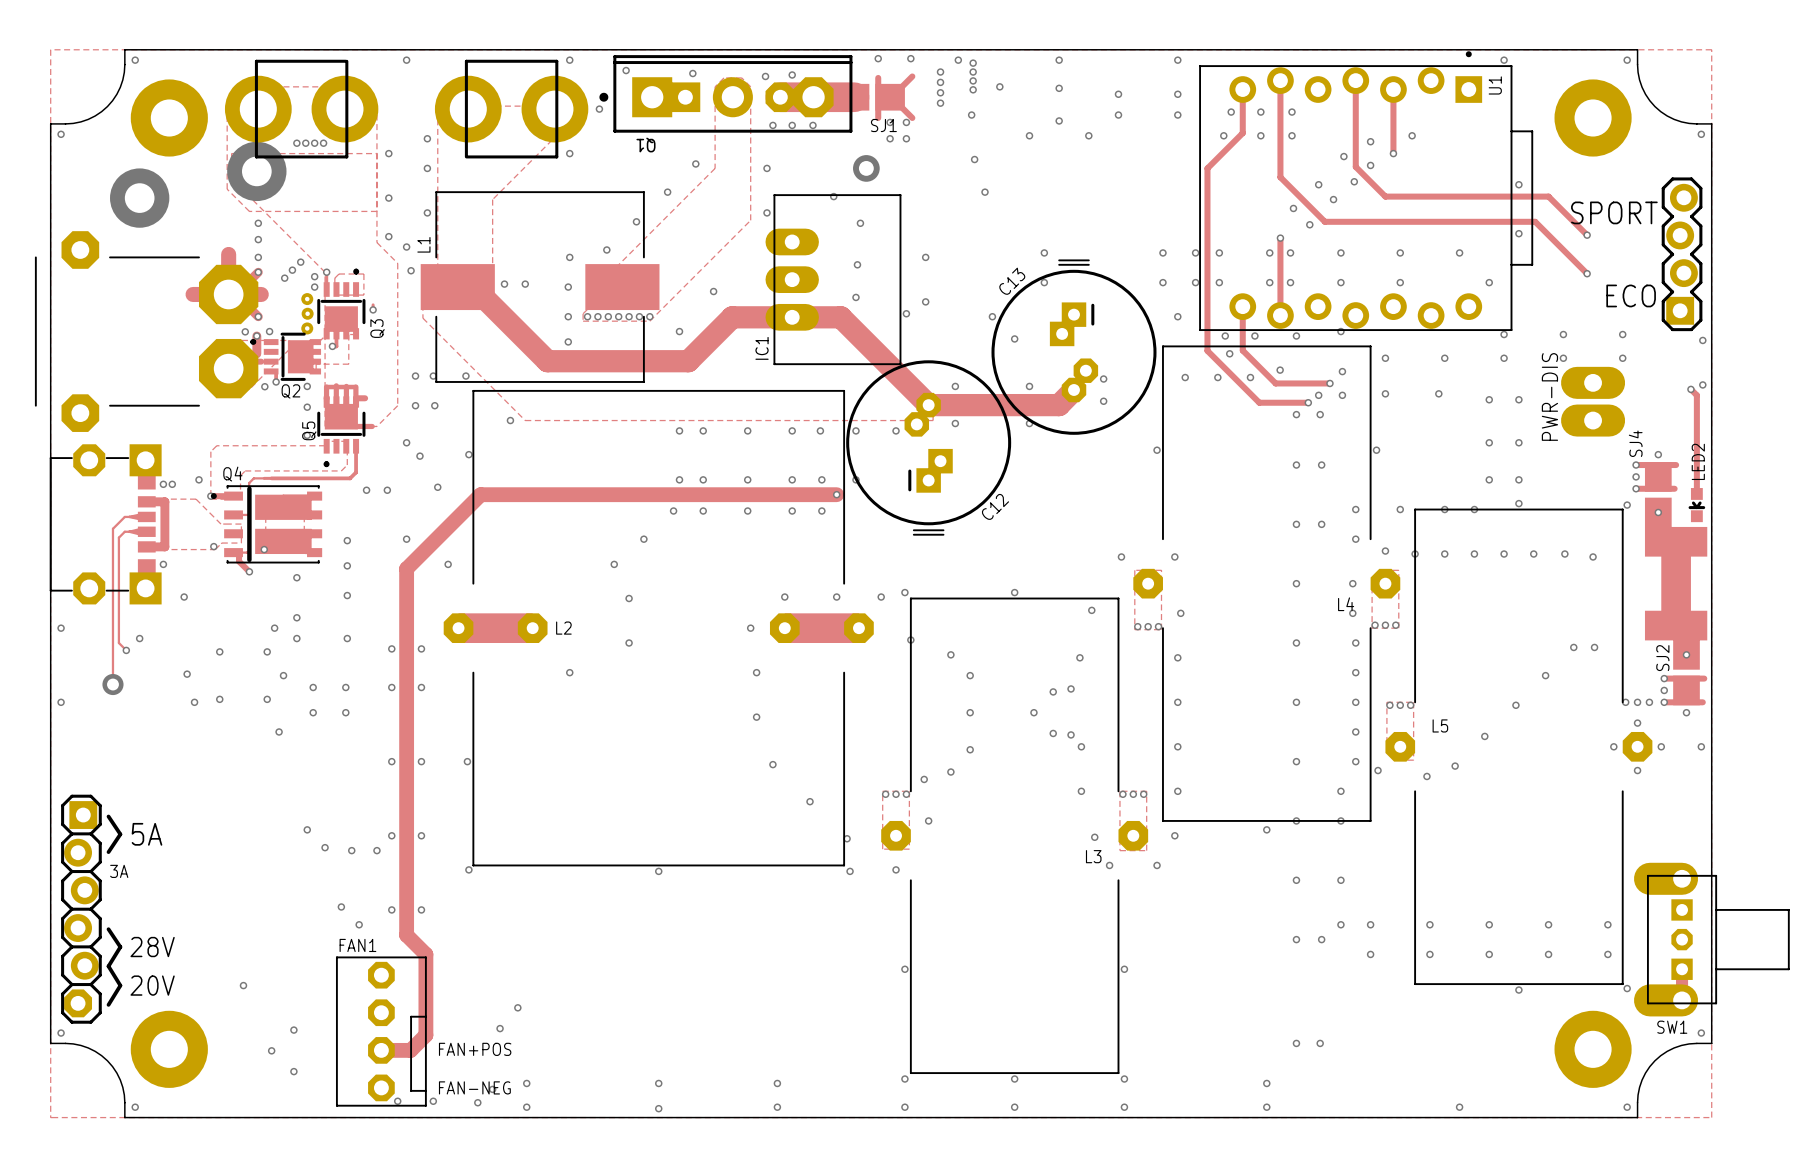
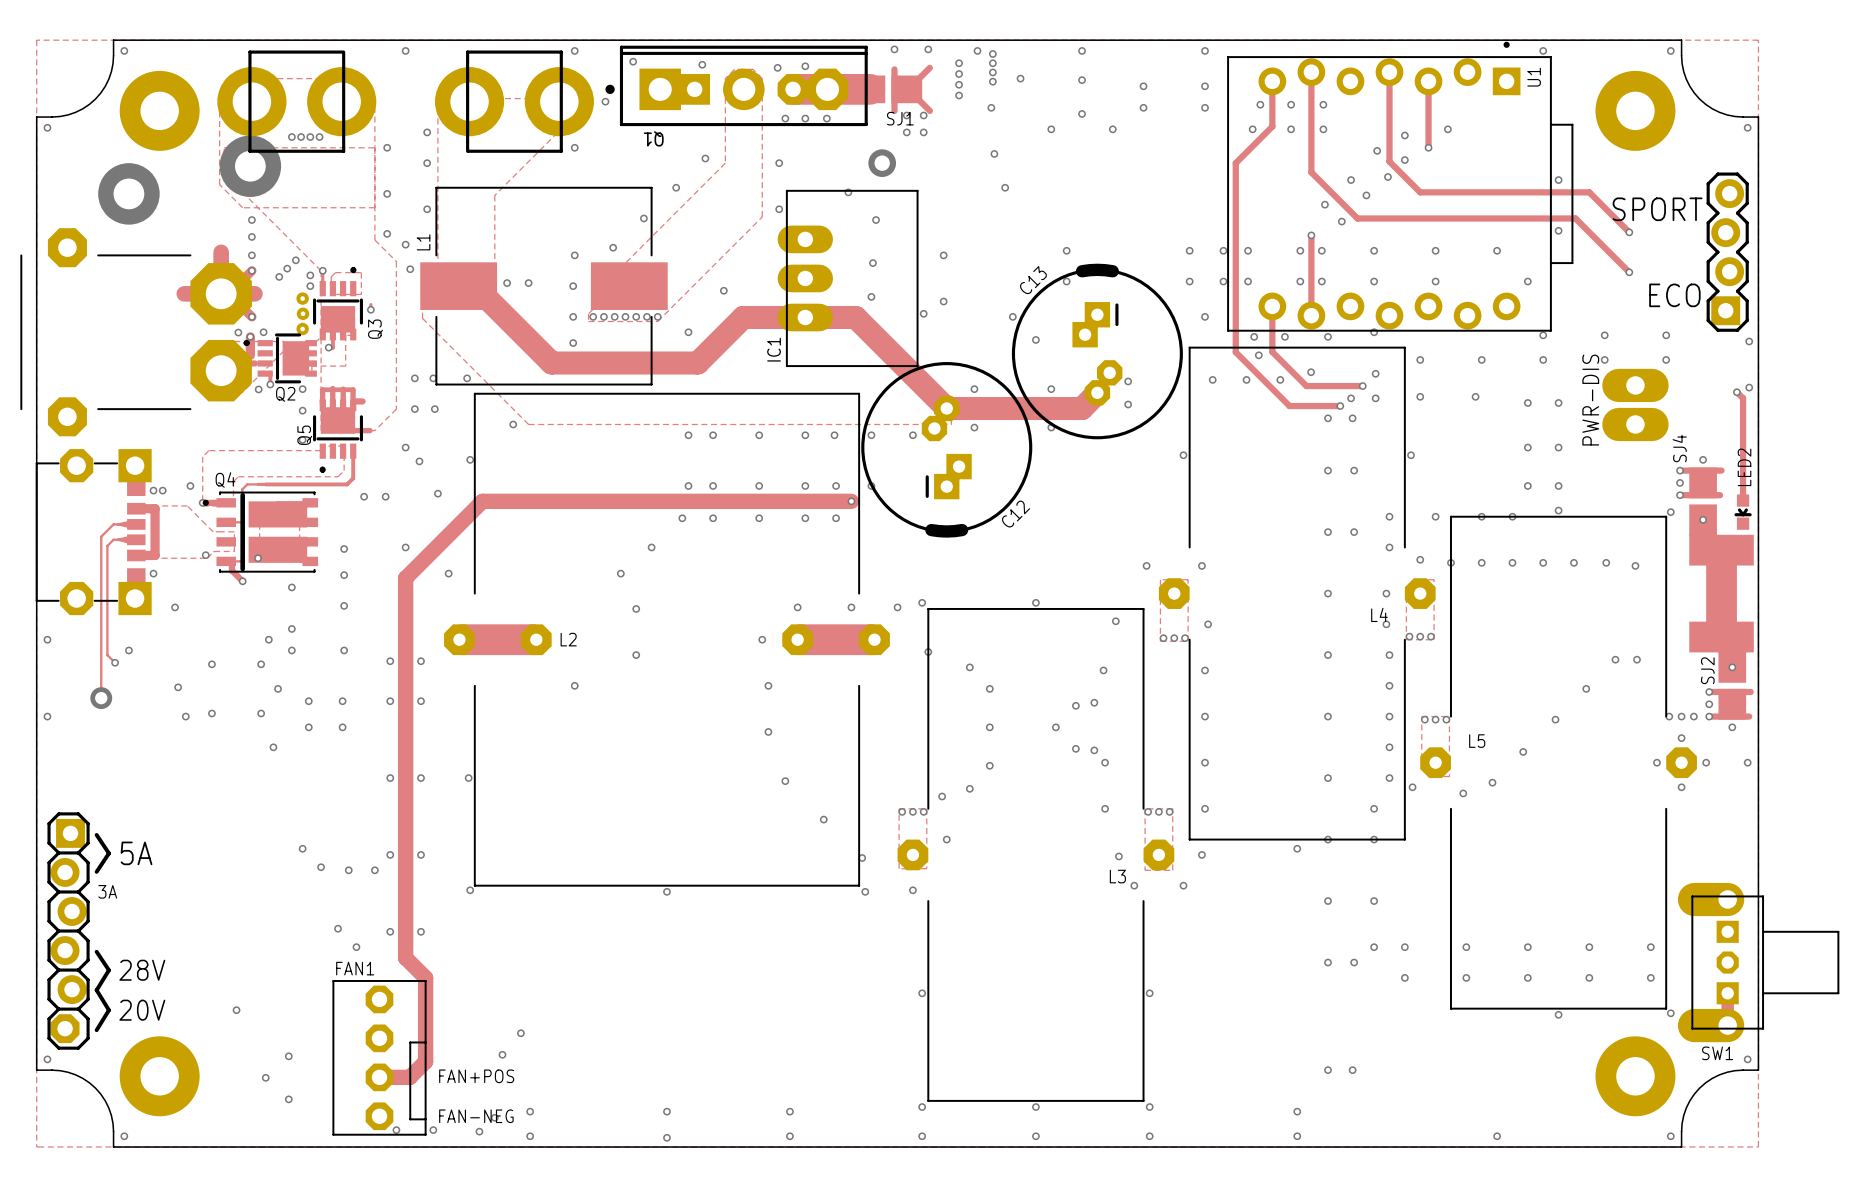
C13 footprint: [991, 259, 1157, 435] -> [1011, 263, 1183, 440]
C12 footprint: [846, 360, 1012, 536] -> [861, 362, 1033, 538]

